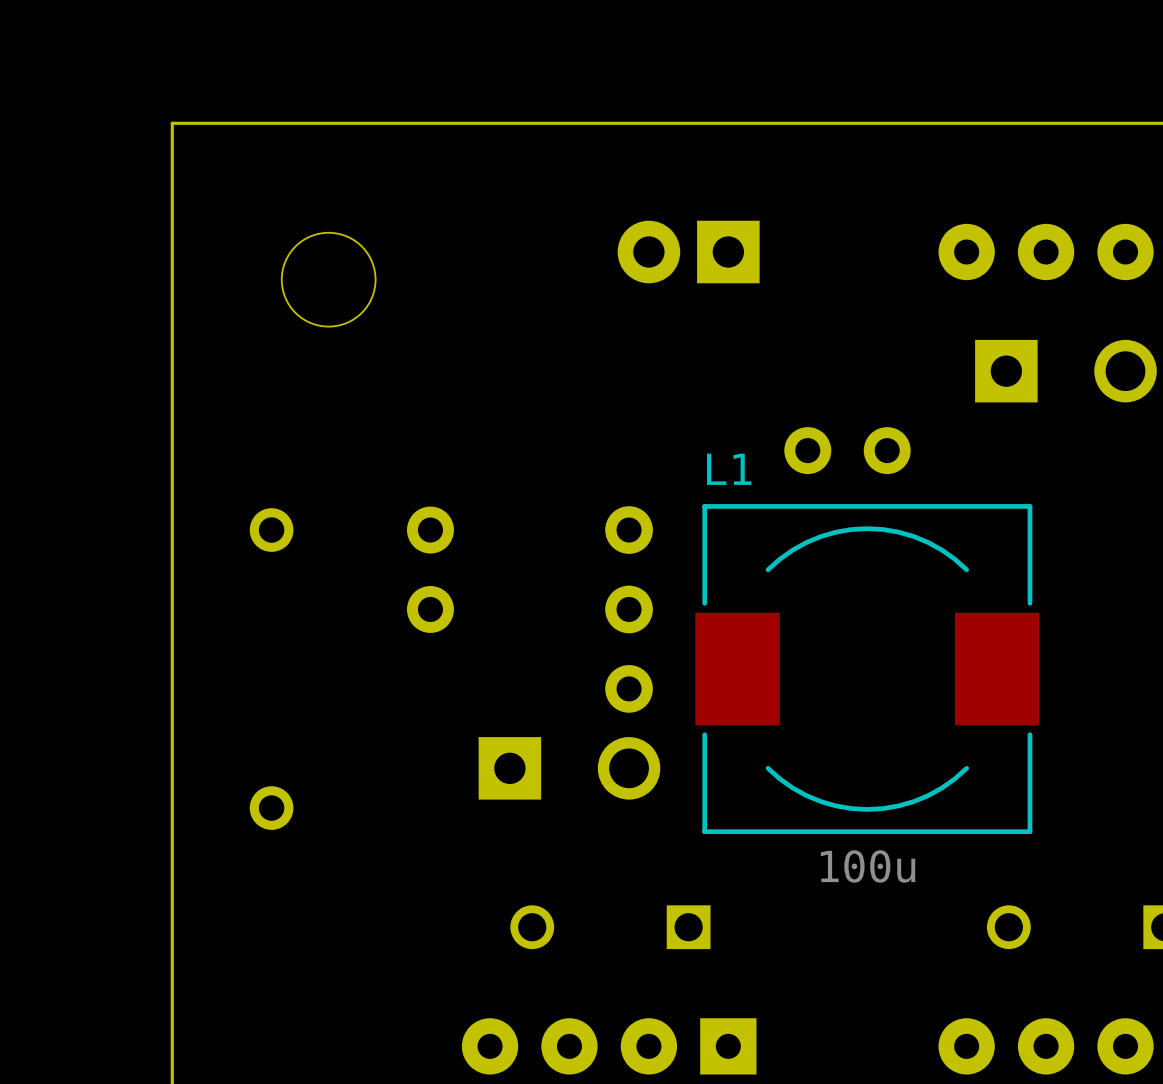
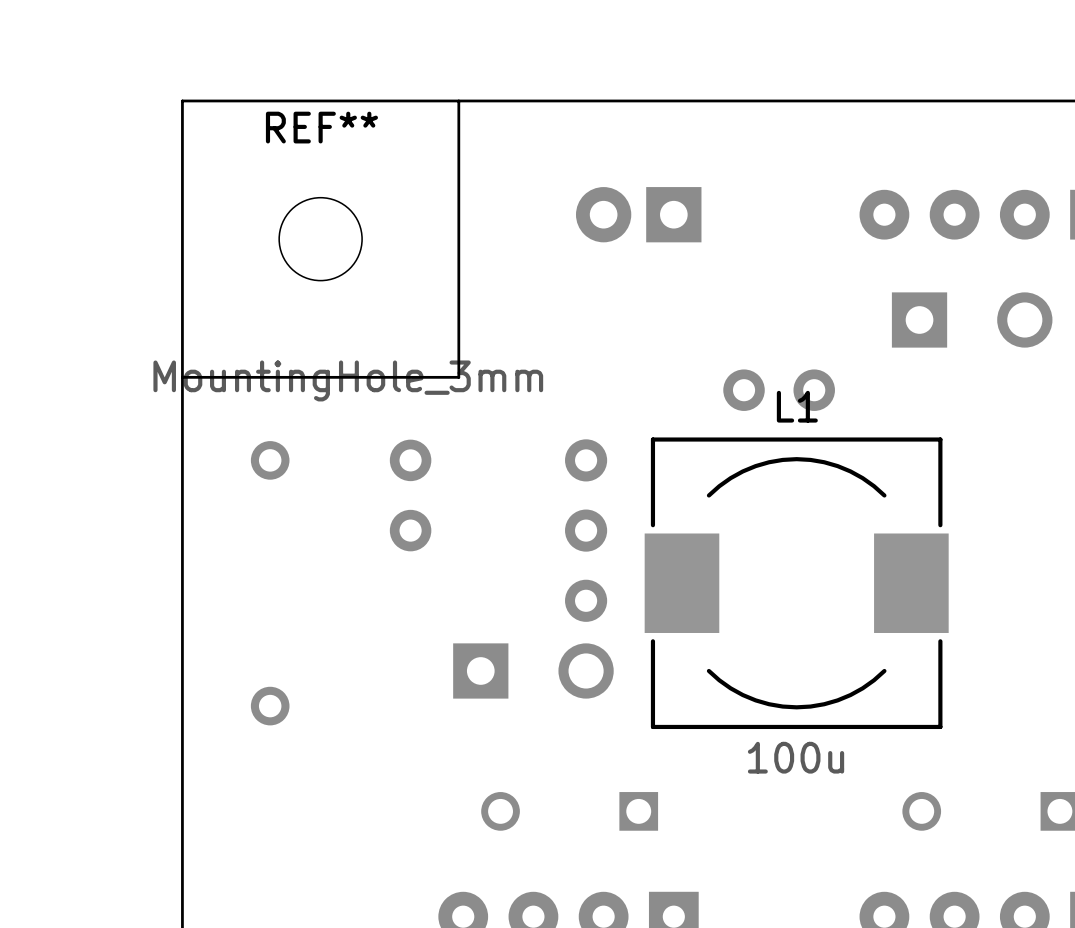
board edge: none -> (458, 100) (458, 377) (182, 377)
REF** name: none -> REF** (321, 127)
REF** value: none -> MountingHole_3mm (348, 380)
L1 name position: L1 (729, 469) -> L1 (797, 406)

